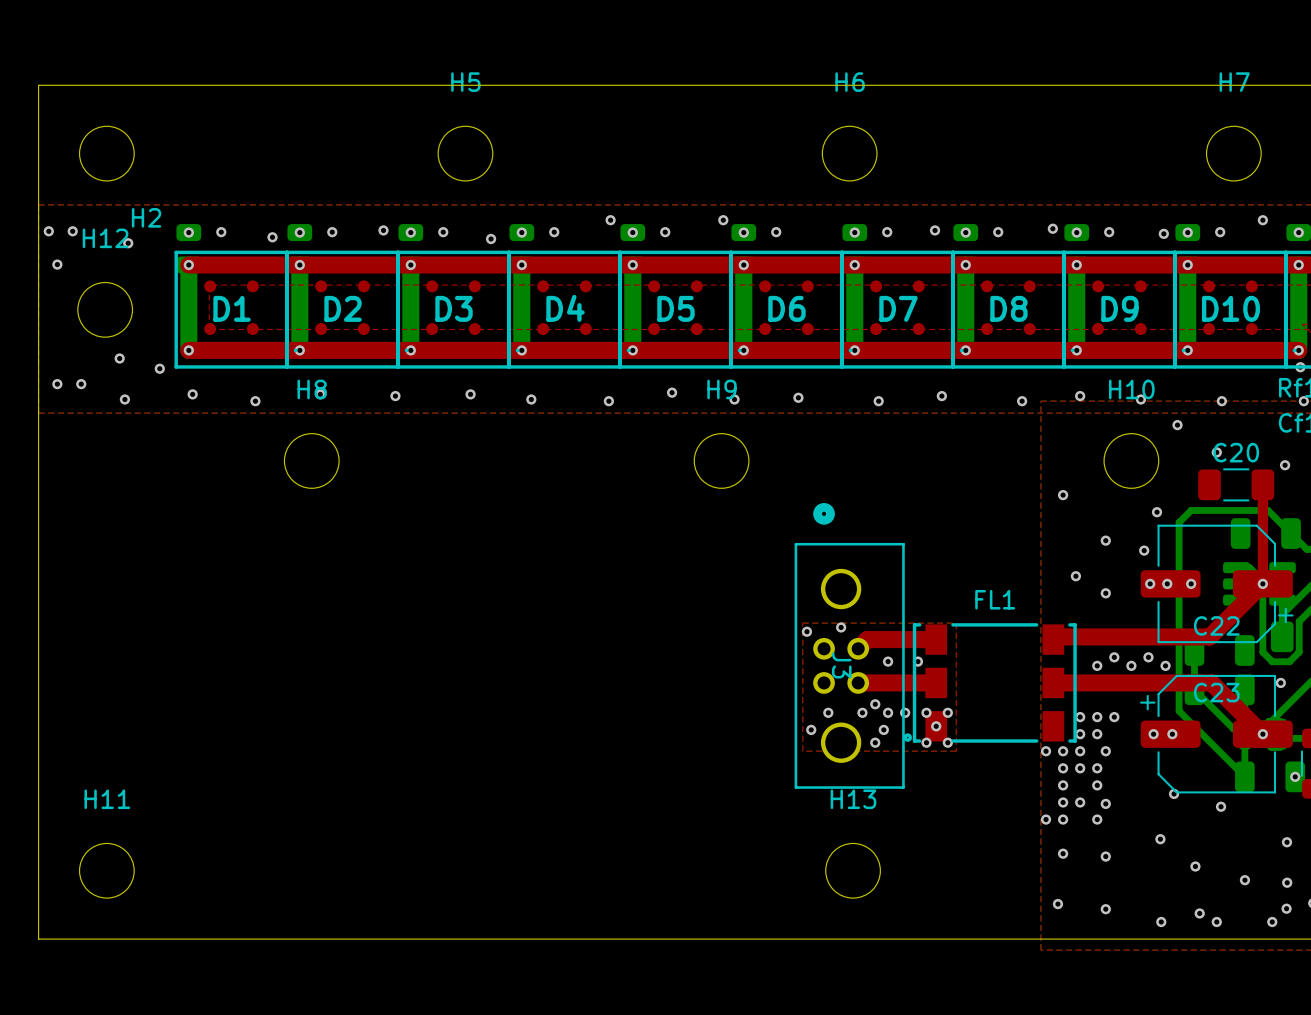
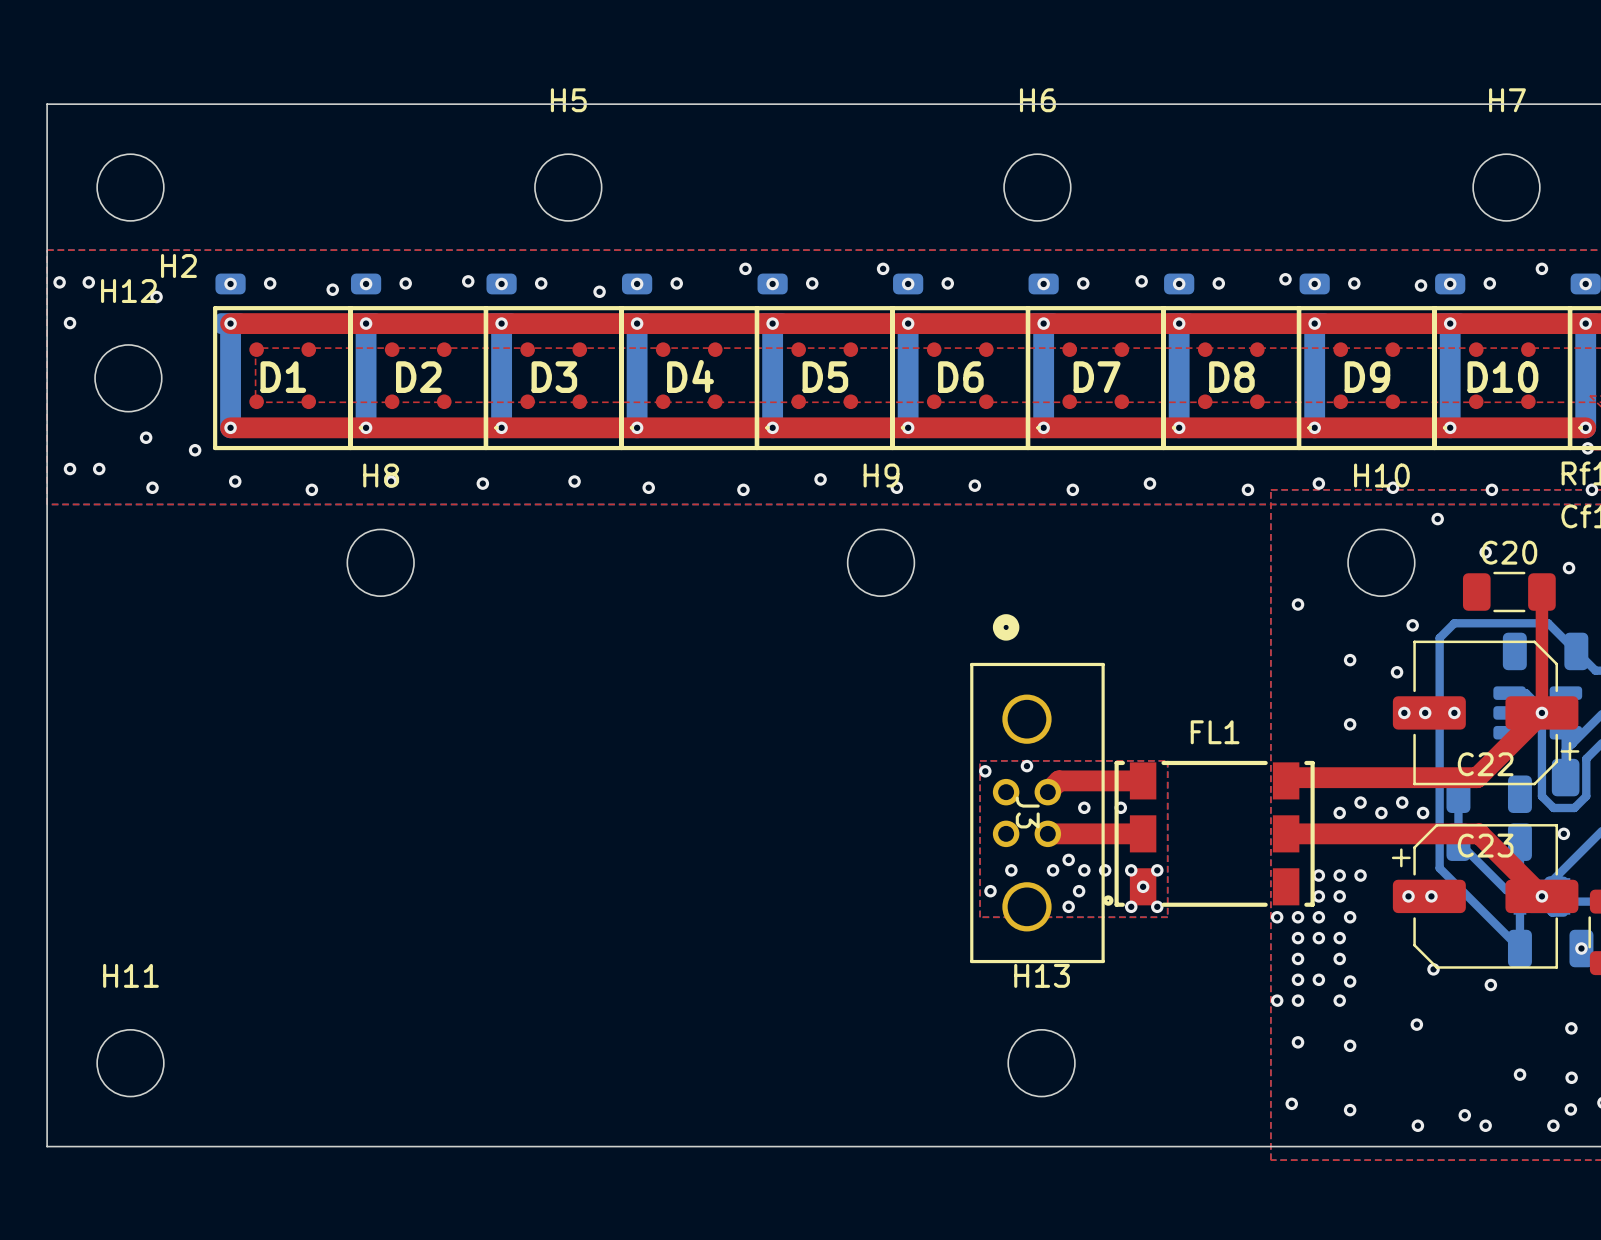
via: (1075, 576) -> none
via: (1195, 866) -> none

